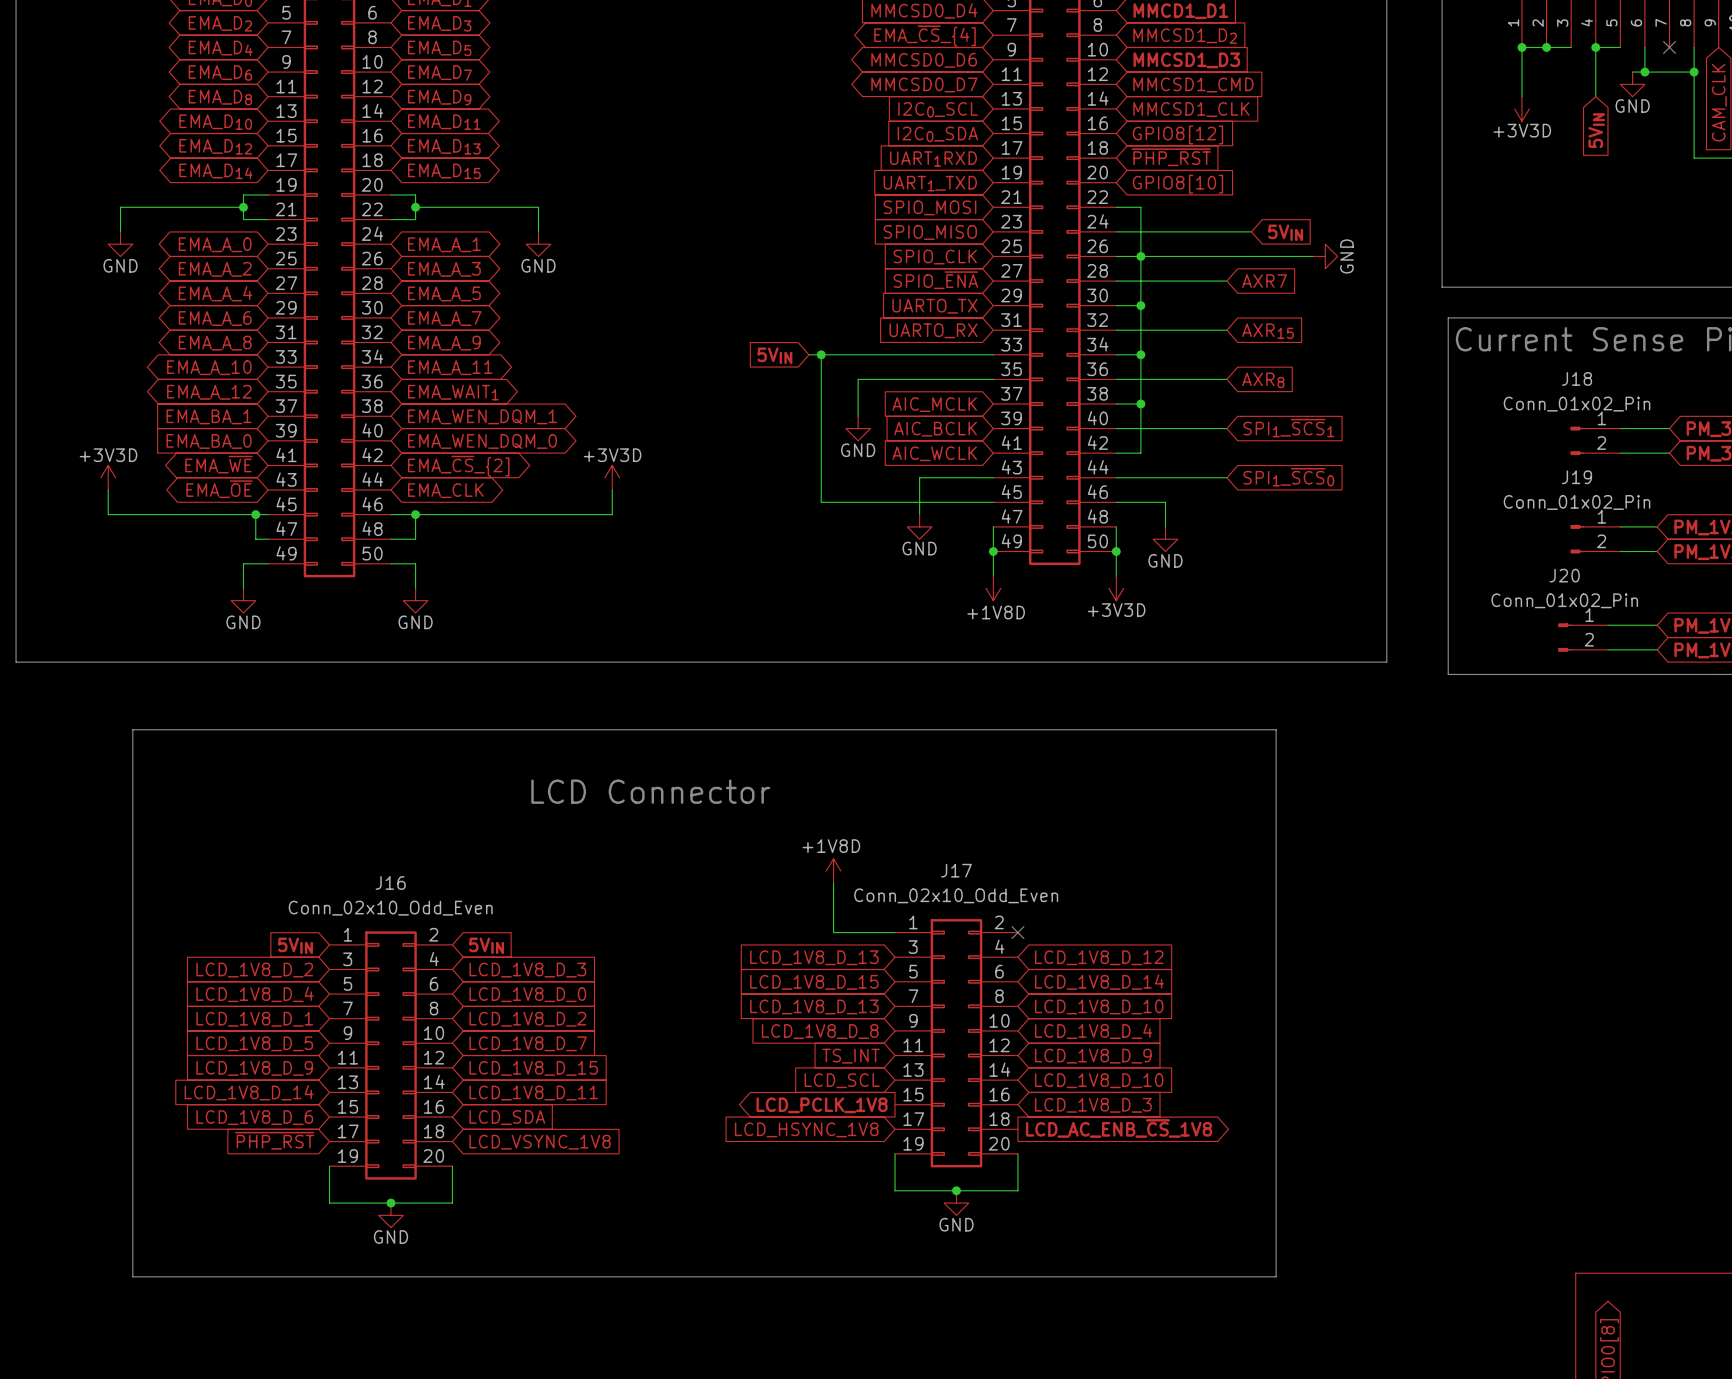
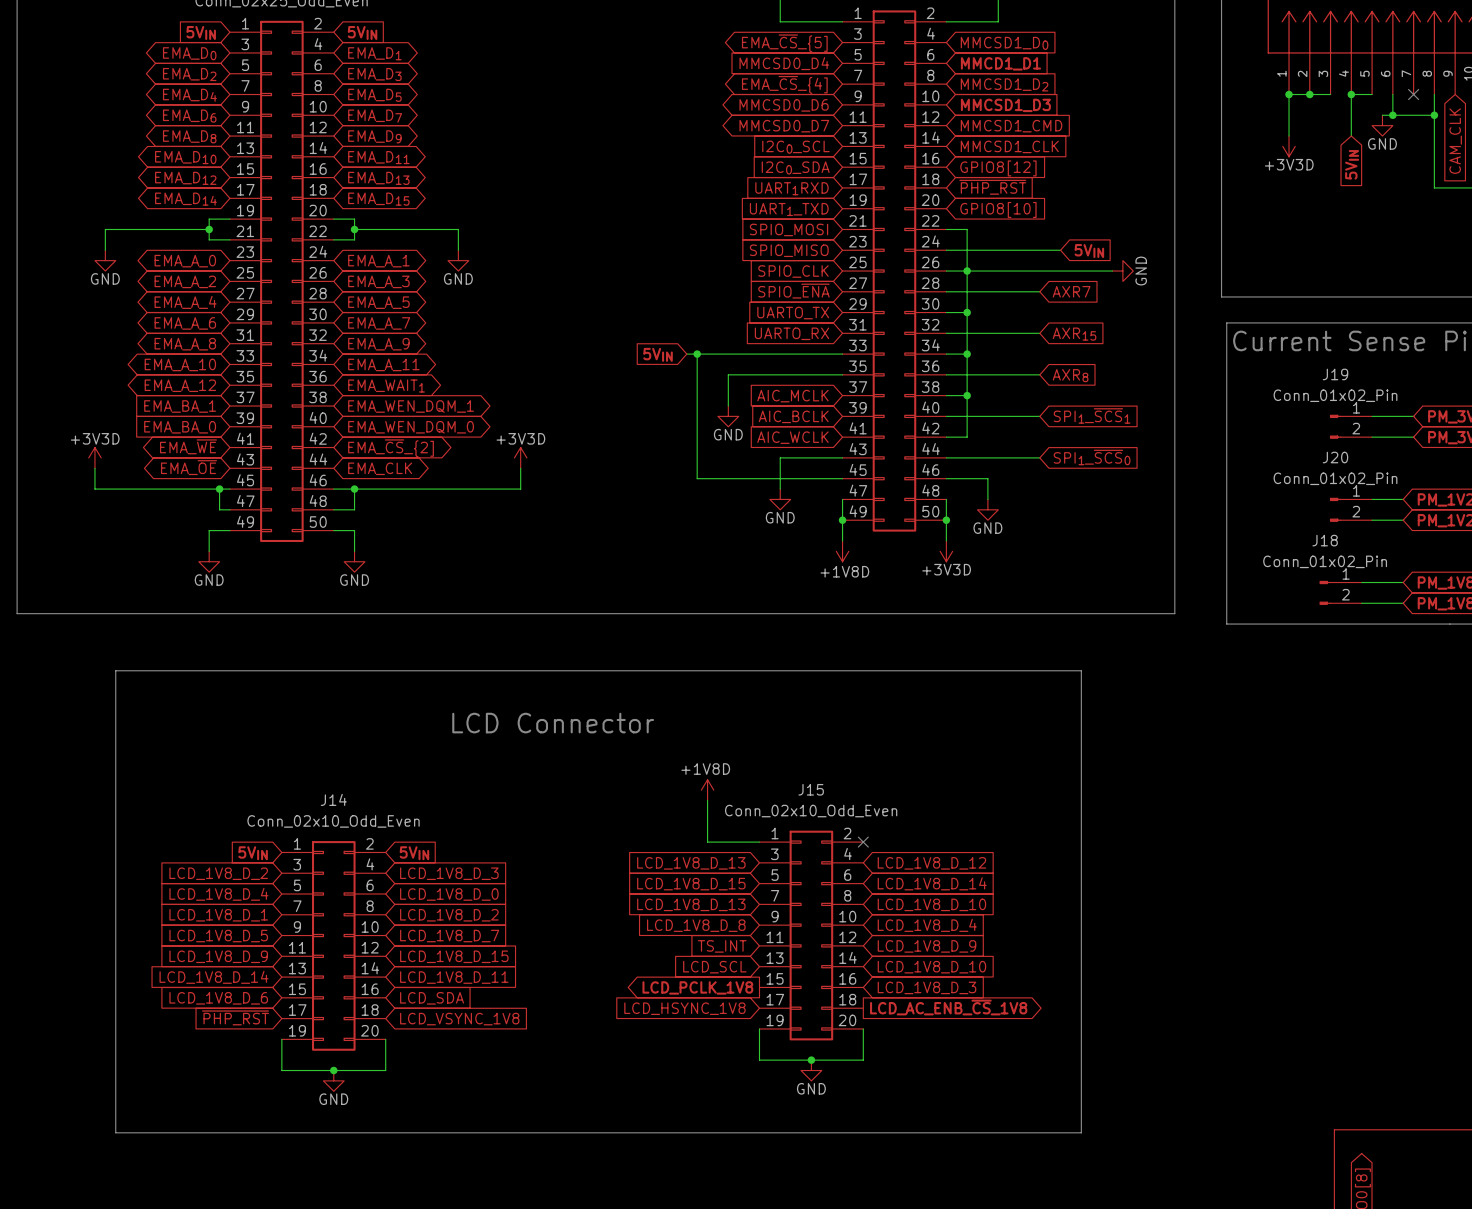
J18 name: J18 (1577, 378) -> J19 (1335, 374)
J19 name: J19 (1577, 477) -> J20 (1335, 457)
J20 name: J20 (1564, 575) -> J18 (1325, 540)
J17 name: J17 (956, 870) -> J15 (811, 789)
J16 name: J16 (390, 882) -> J14 (333, 799)

